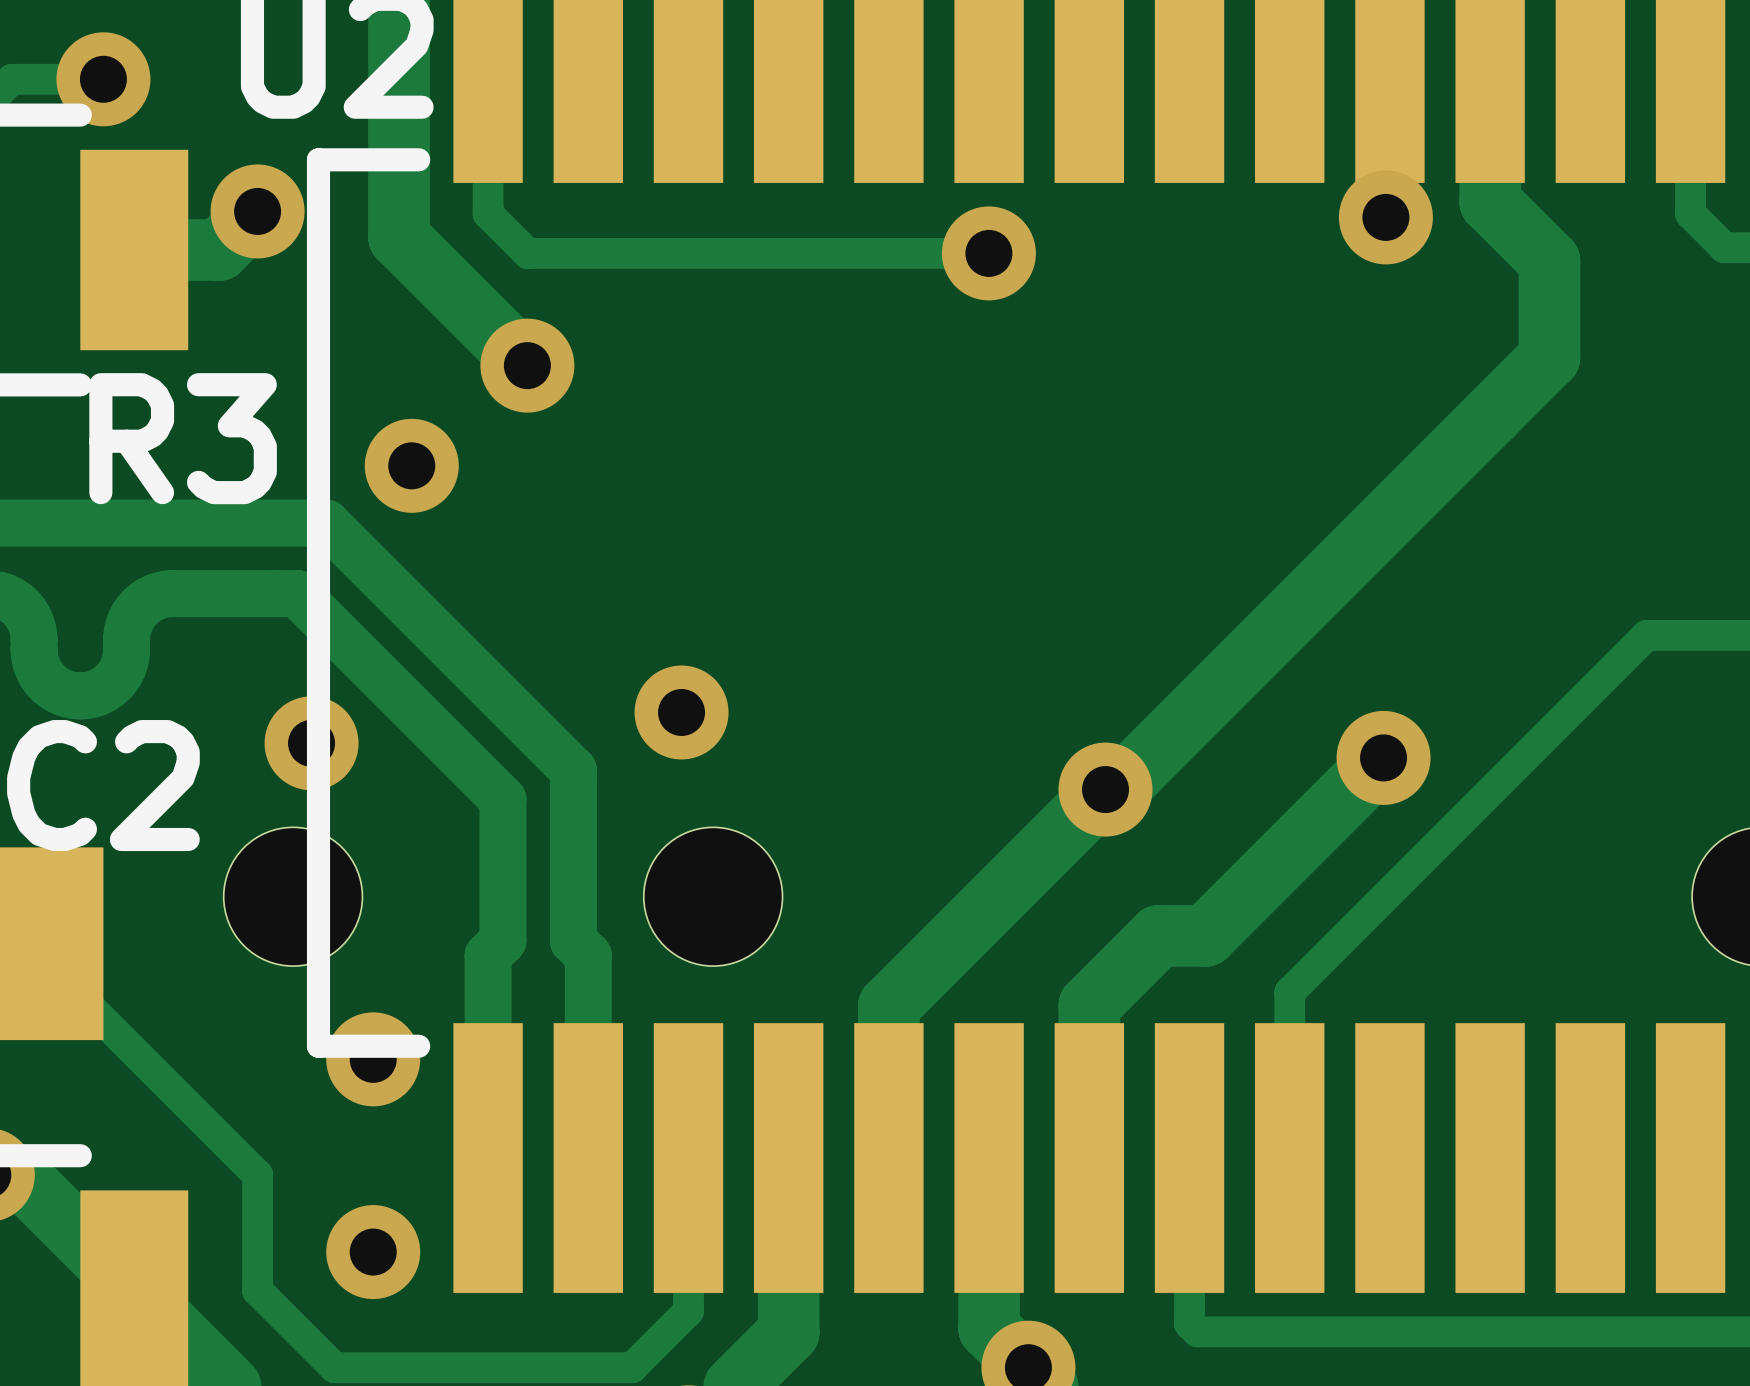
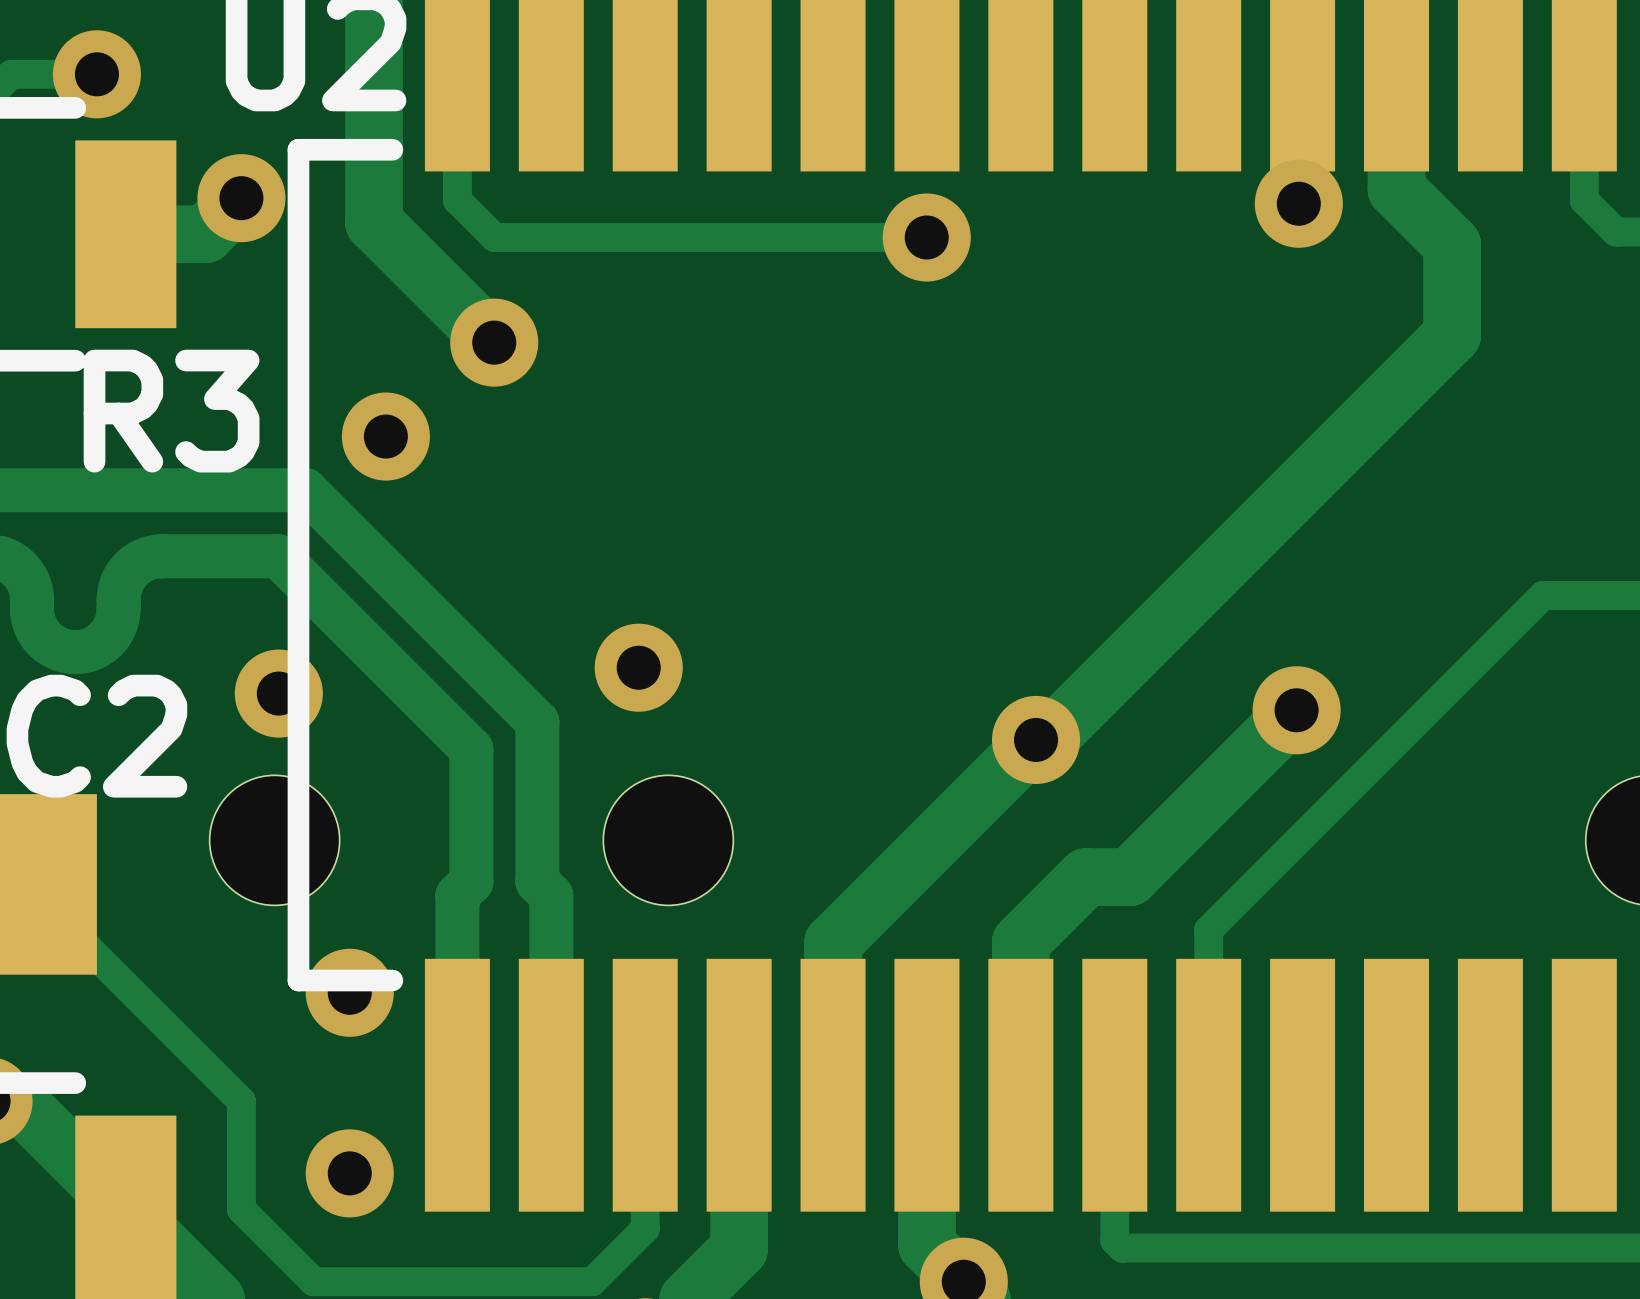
via position: (311, 743) -> (278, 693)

